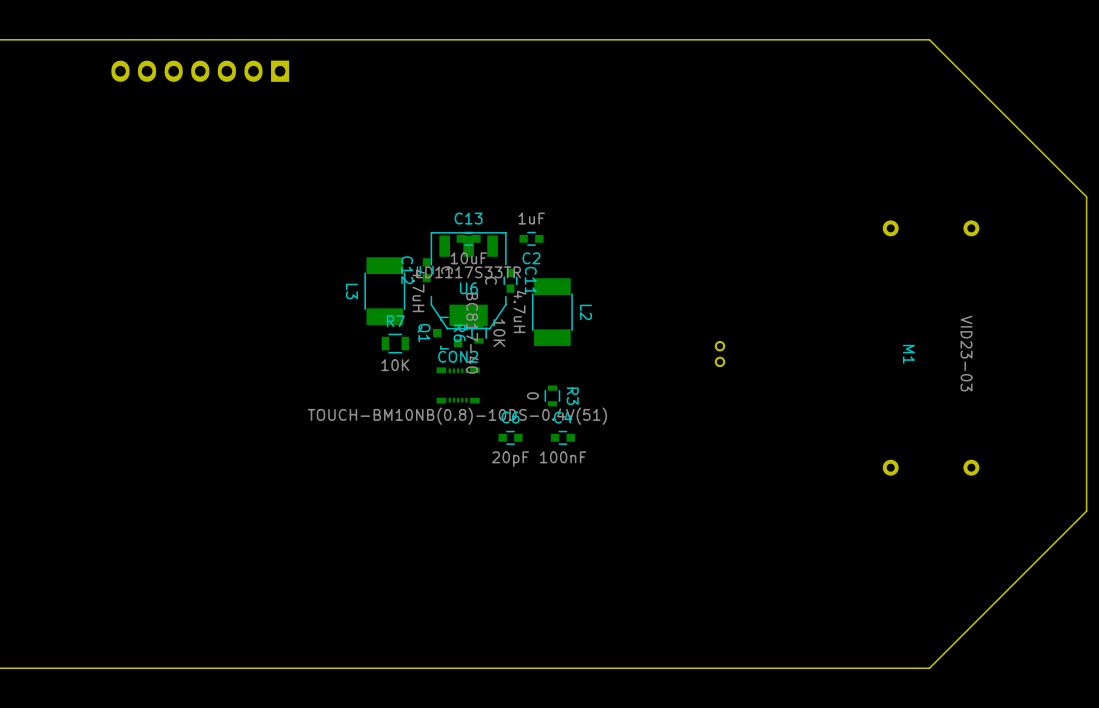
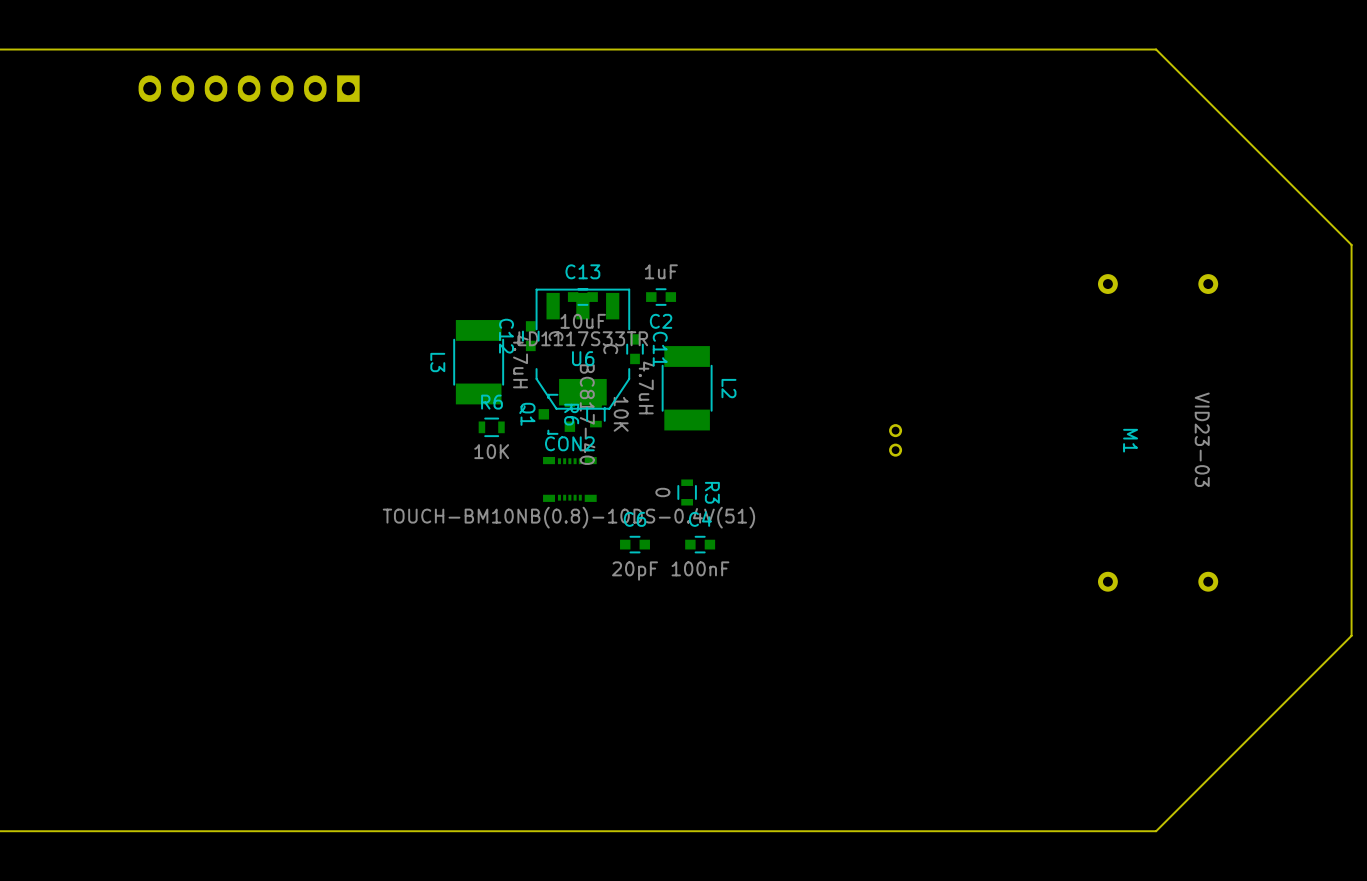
R7: 10K (395, 343) -> none
R6: none -> 10K (491, 427)

